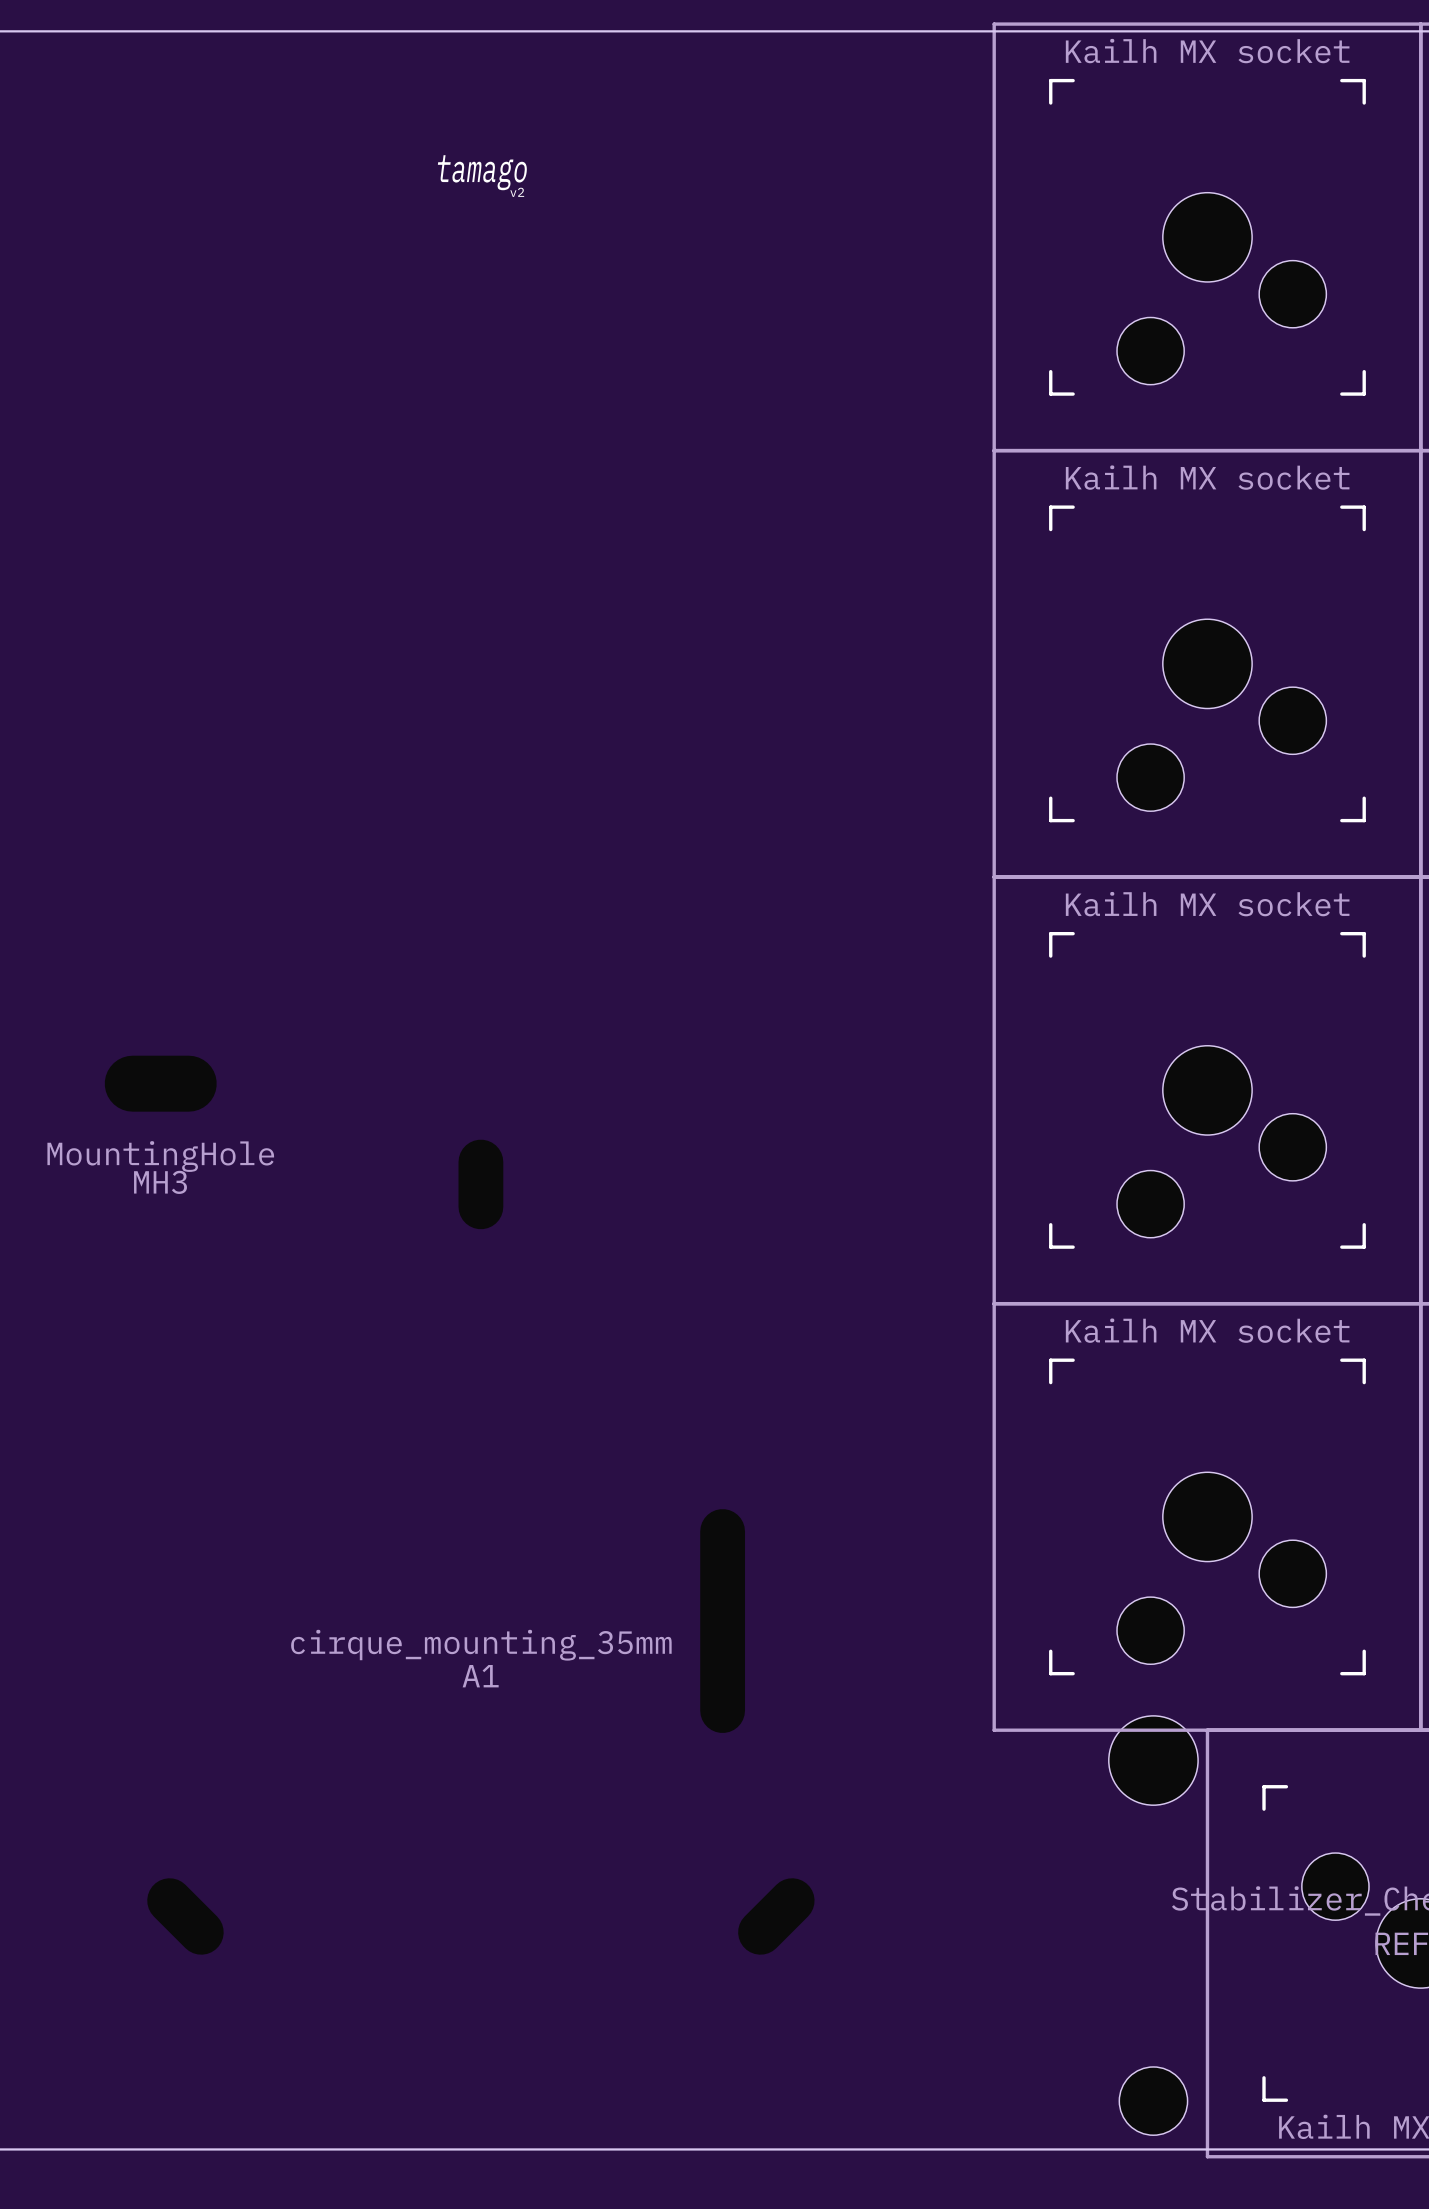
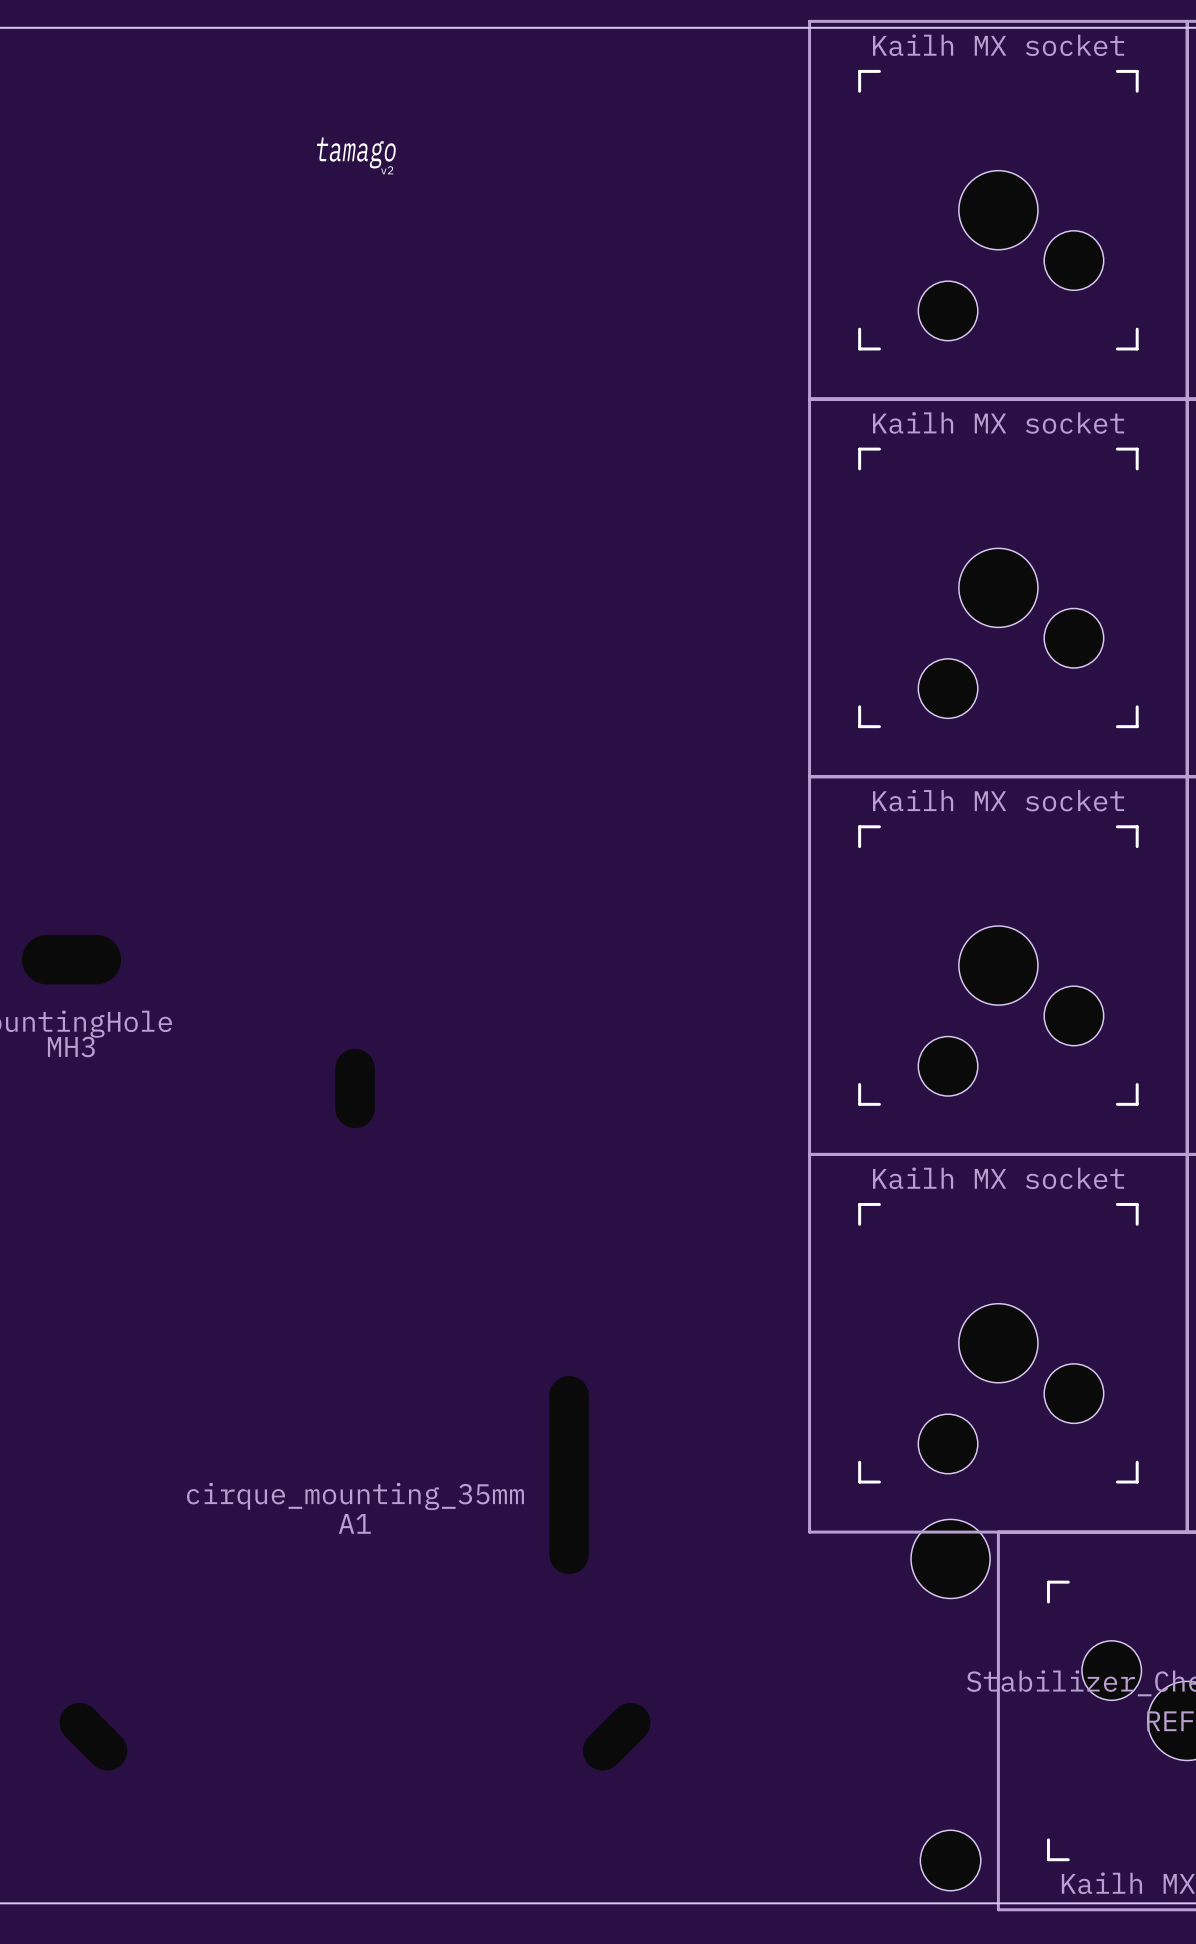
A1 position: (480, 1547) -> (355, 1409)

